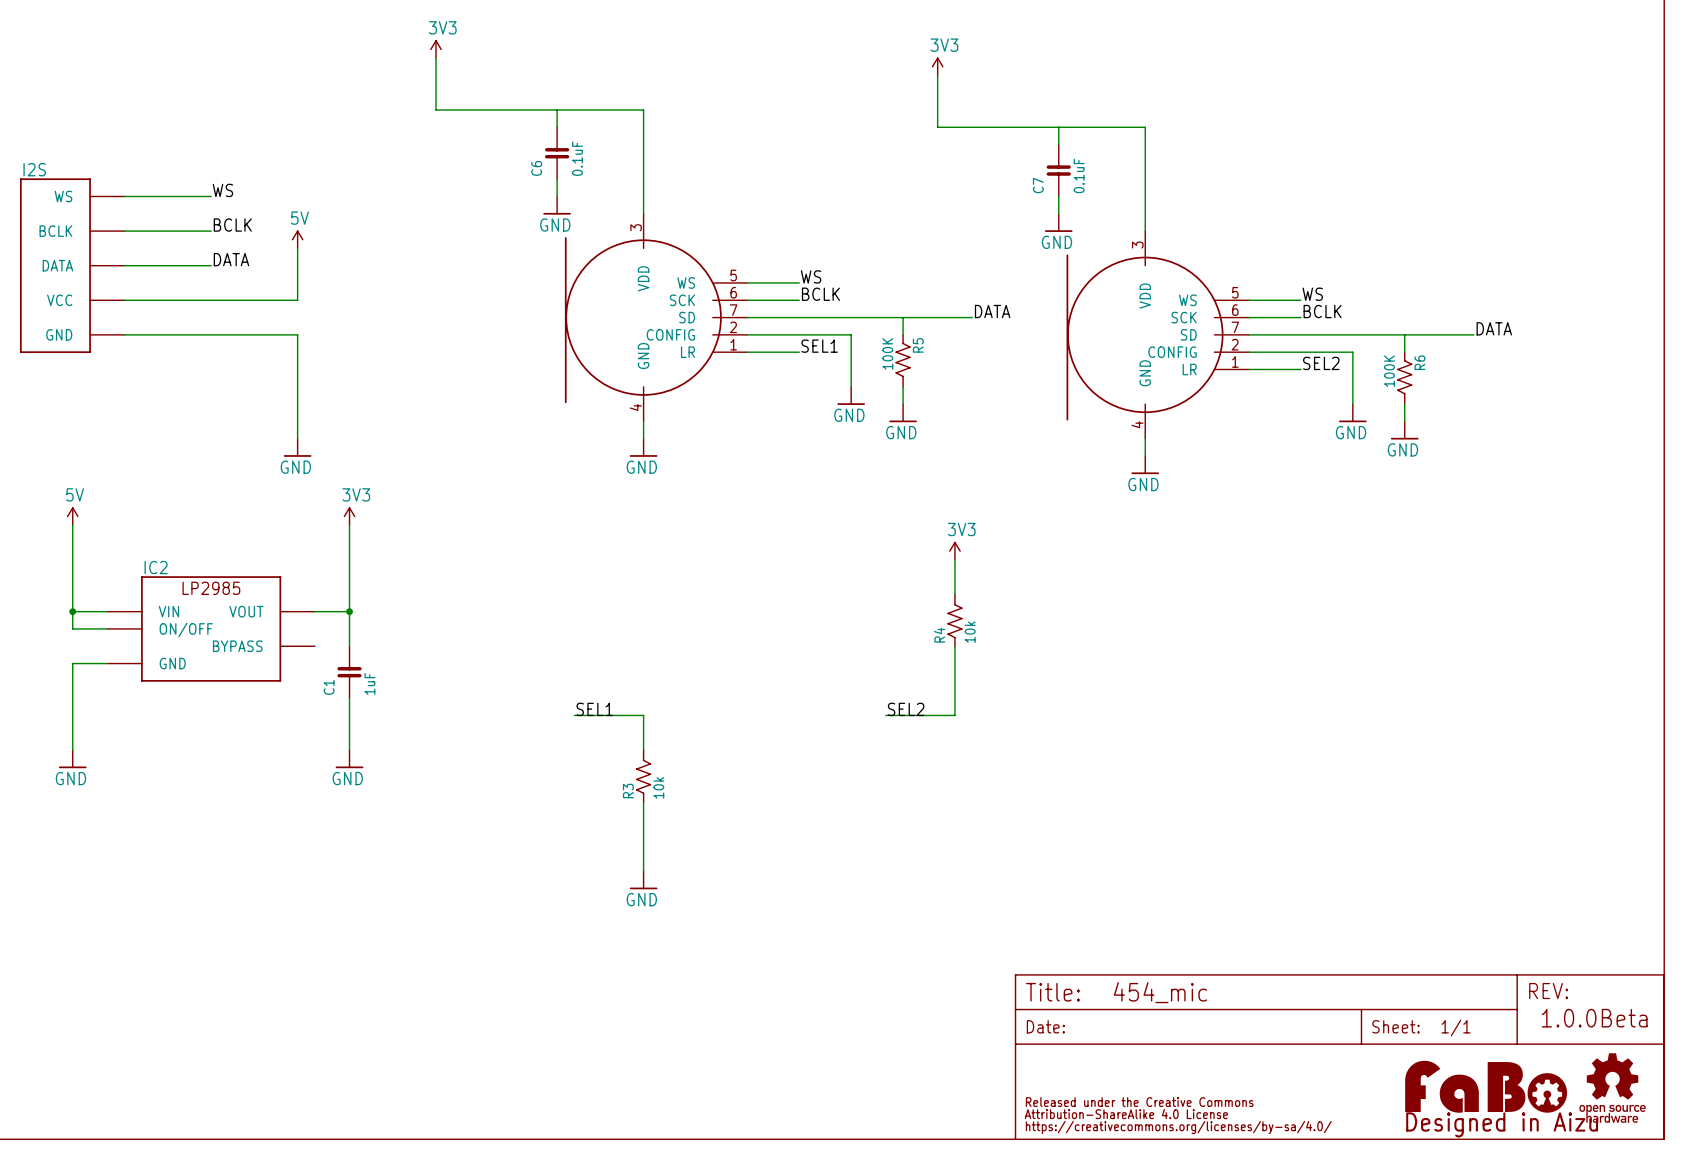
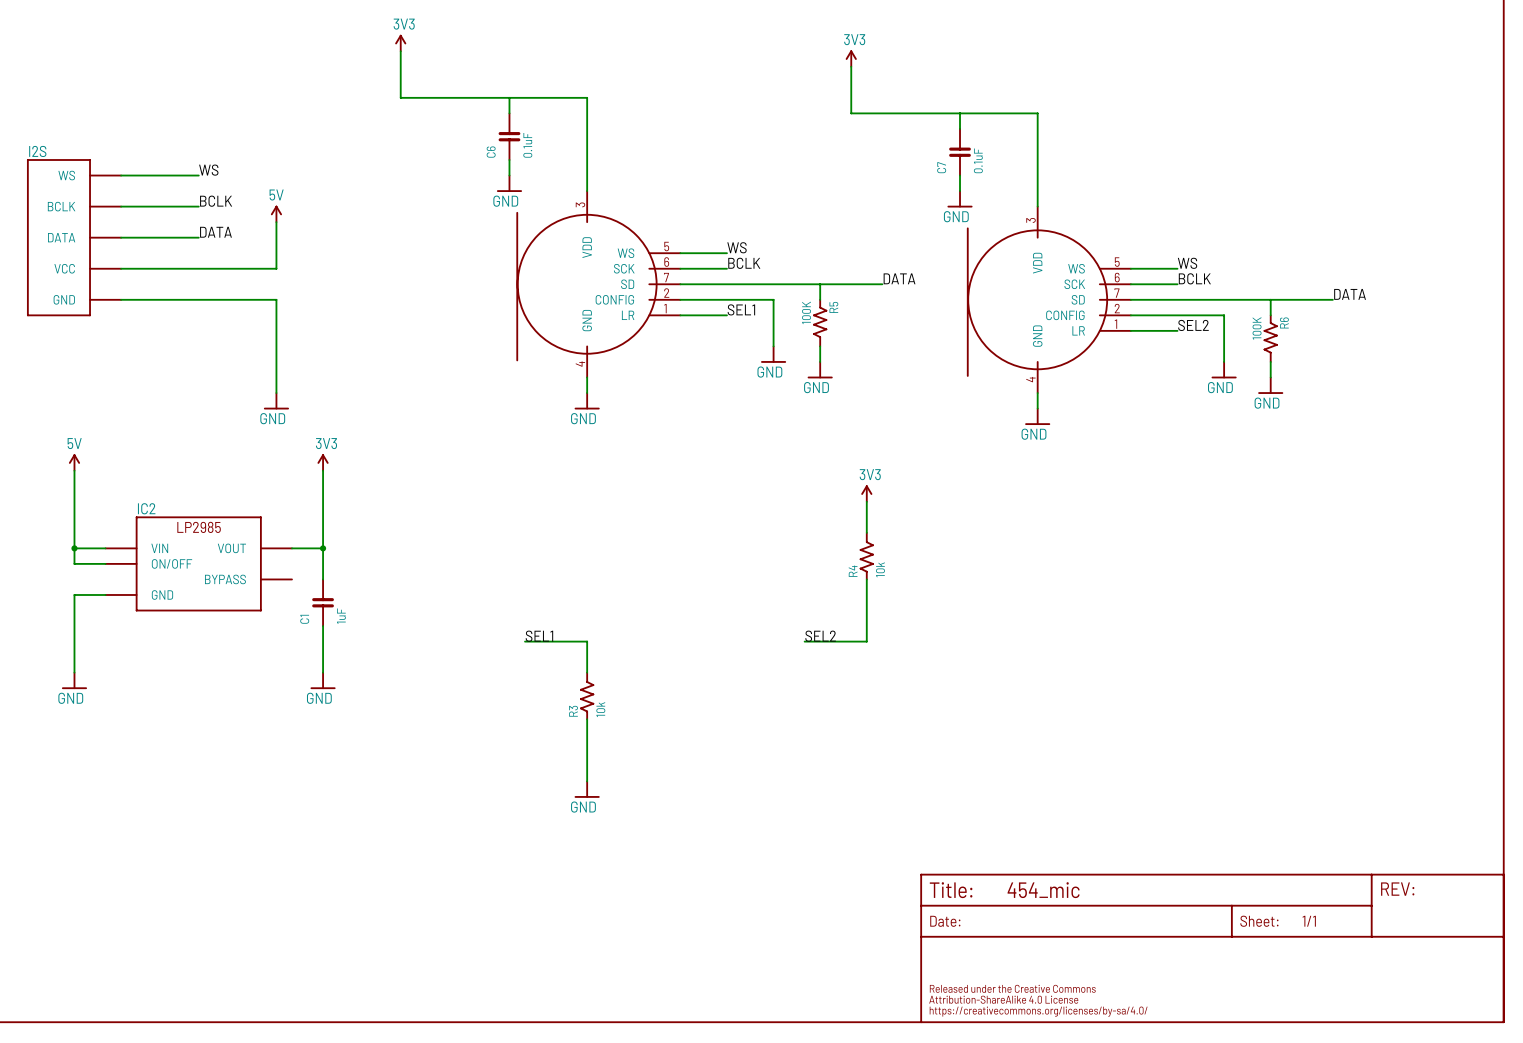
text: 1.0.0Beta (1594, 1018) -> none
part: (1486, 1086) -> none
part: (1612, 1088) -> none

